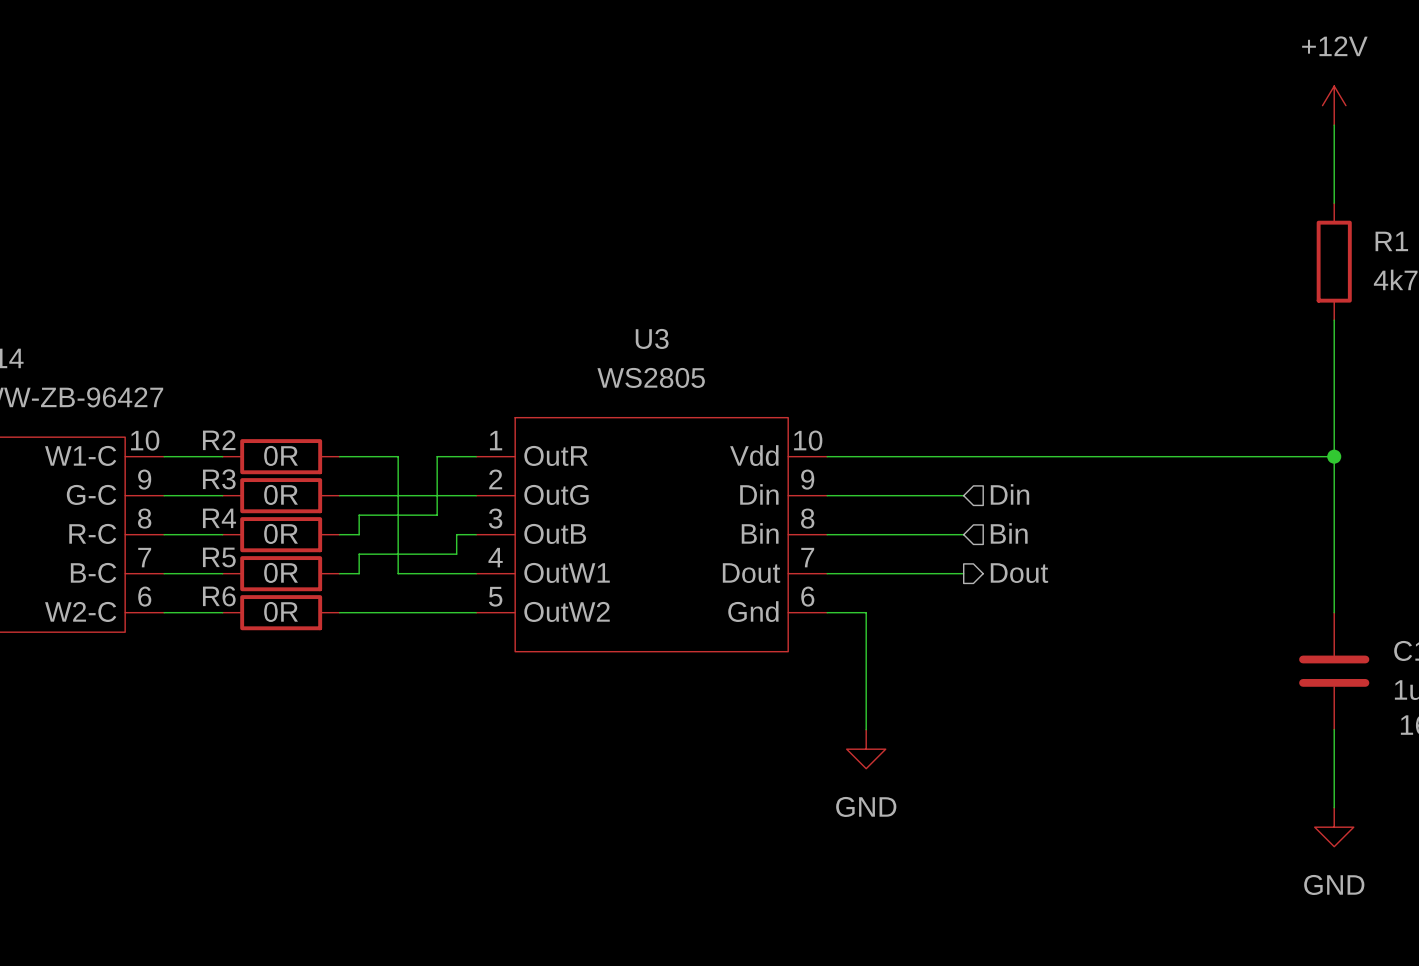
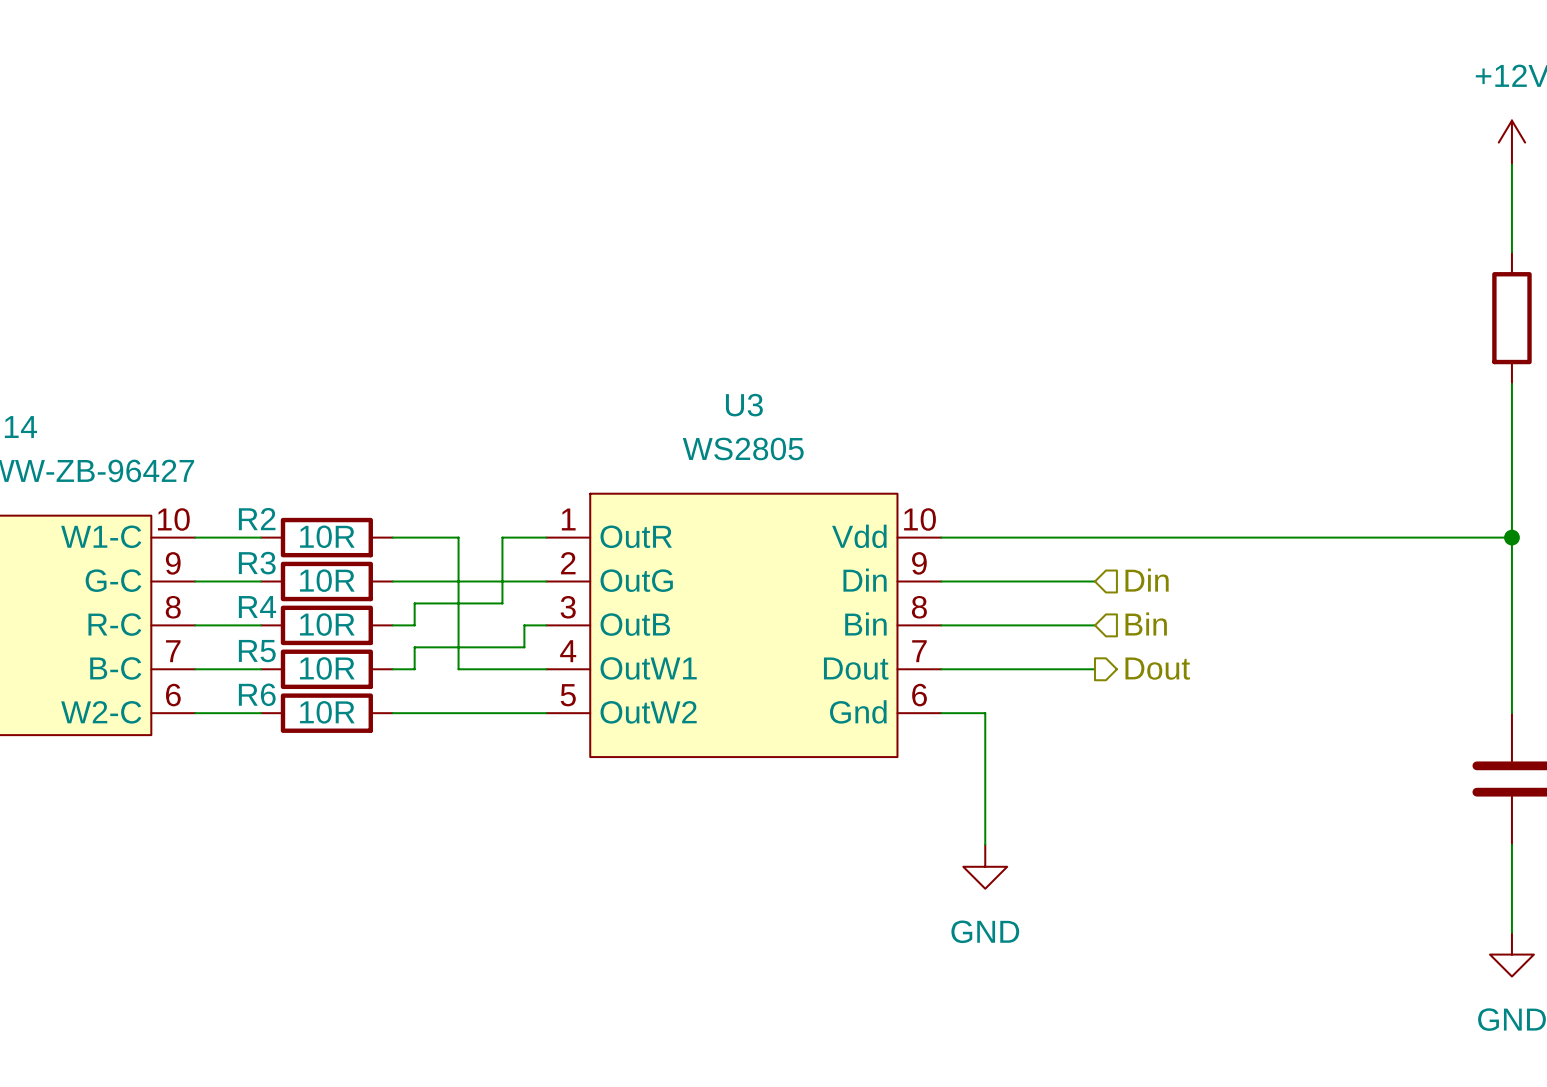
R2 value: 0R (281, 455) -> 10R (327, 536)
R3 value: 0R (281, 494) -> 10R (327, 580)
R4 value: 0R (281, 533) -> 10R (327, 624)
R5 value: 0R (281, 572) -> 10R (327, 668)
R6 value: 0R (281, 611) -> 10R (327, 712)

